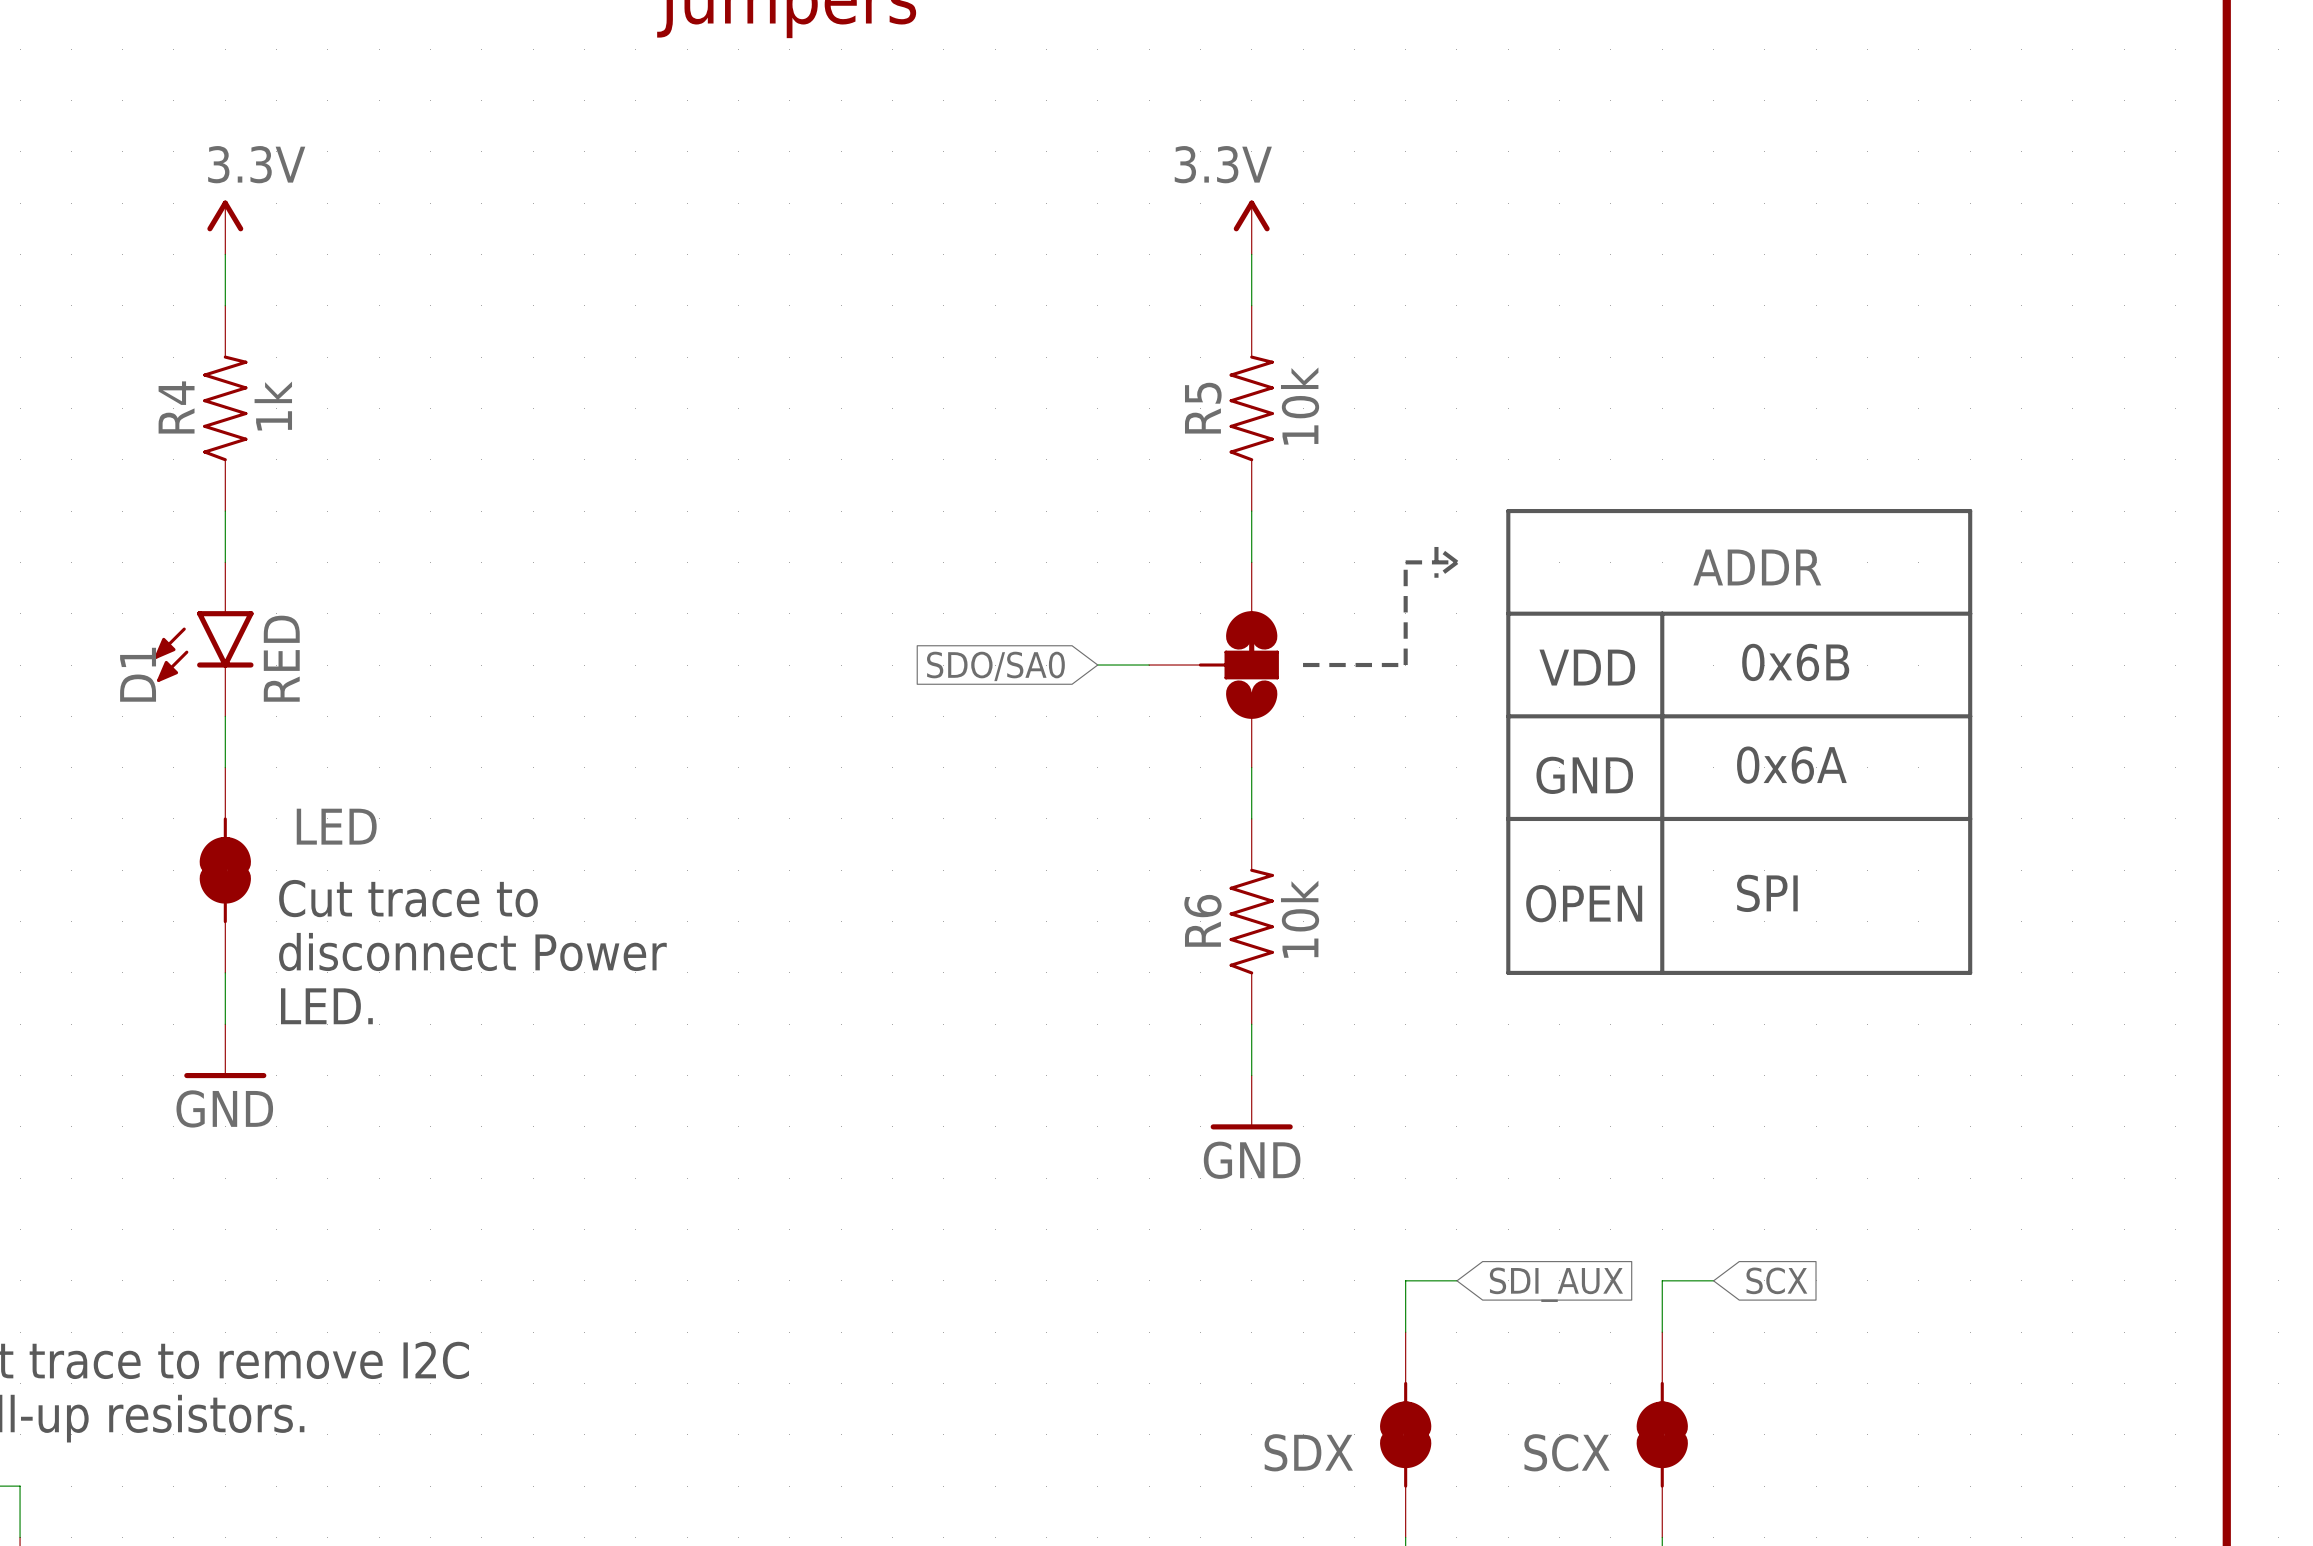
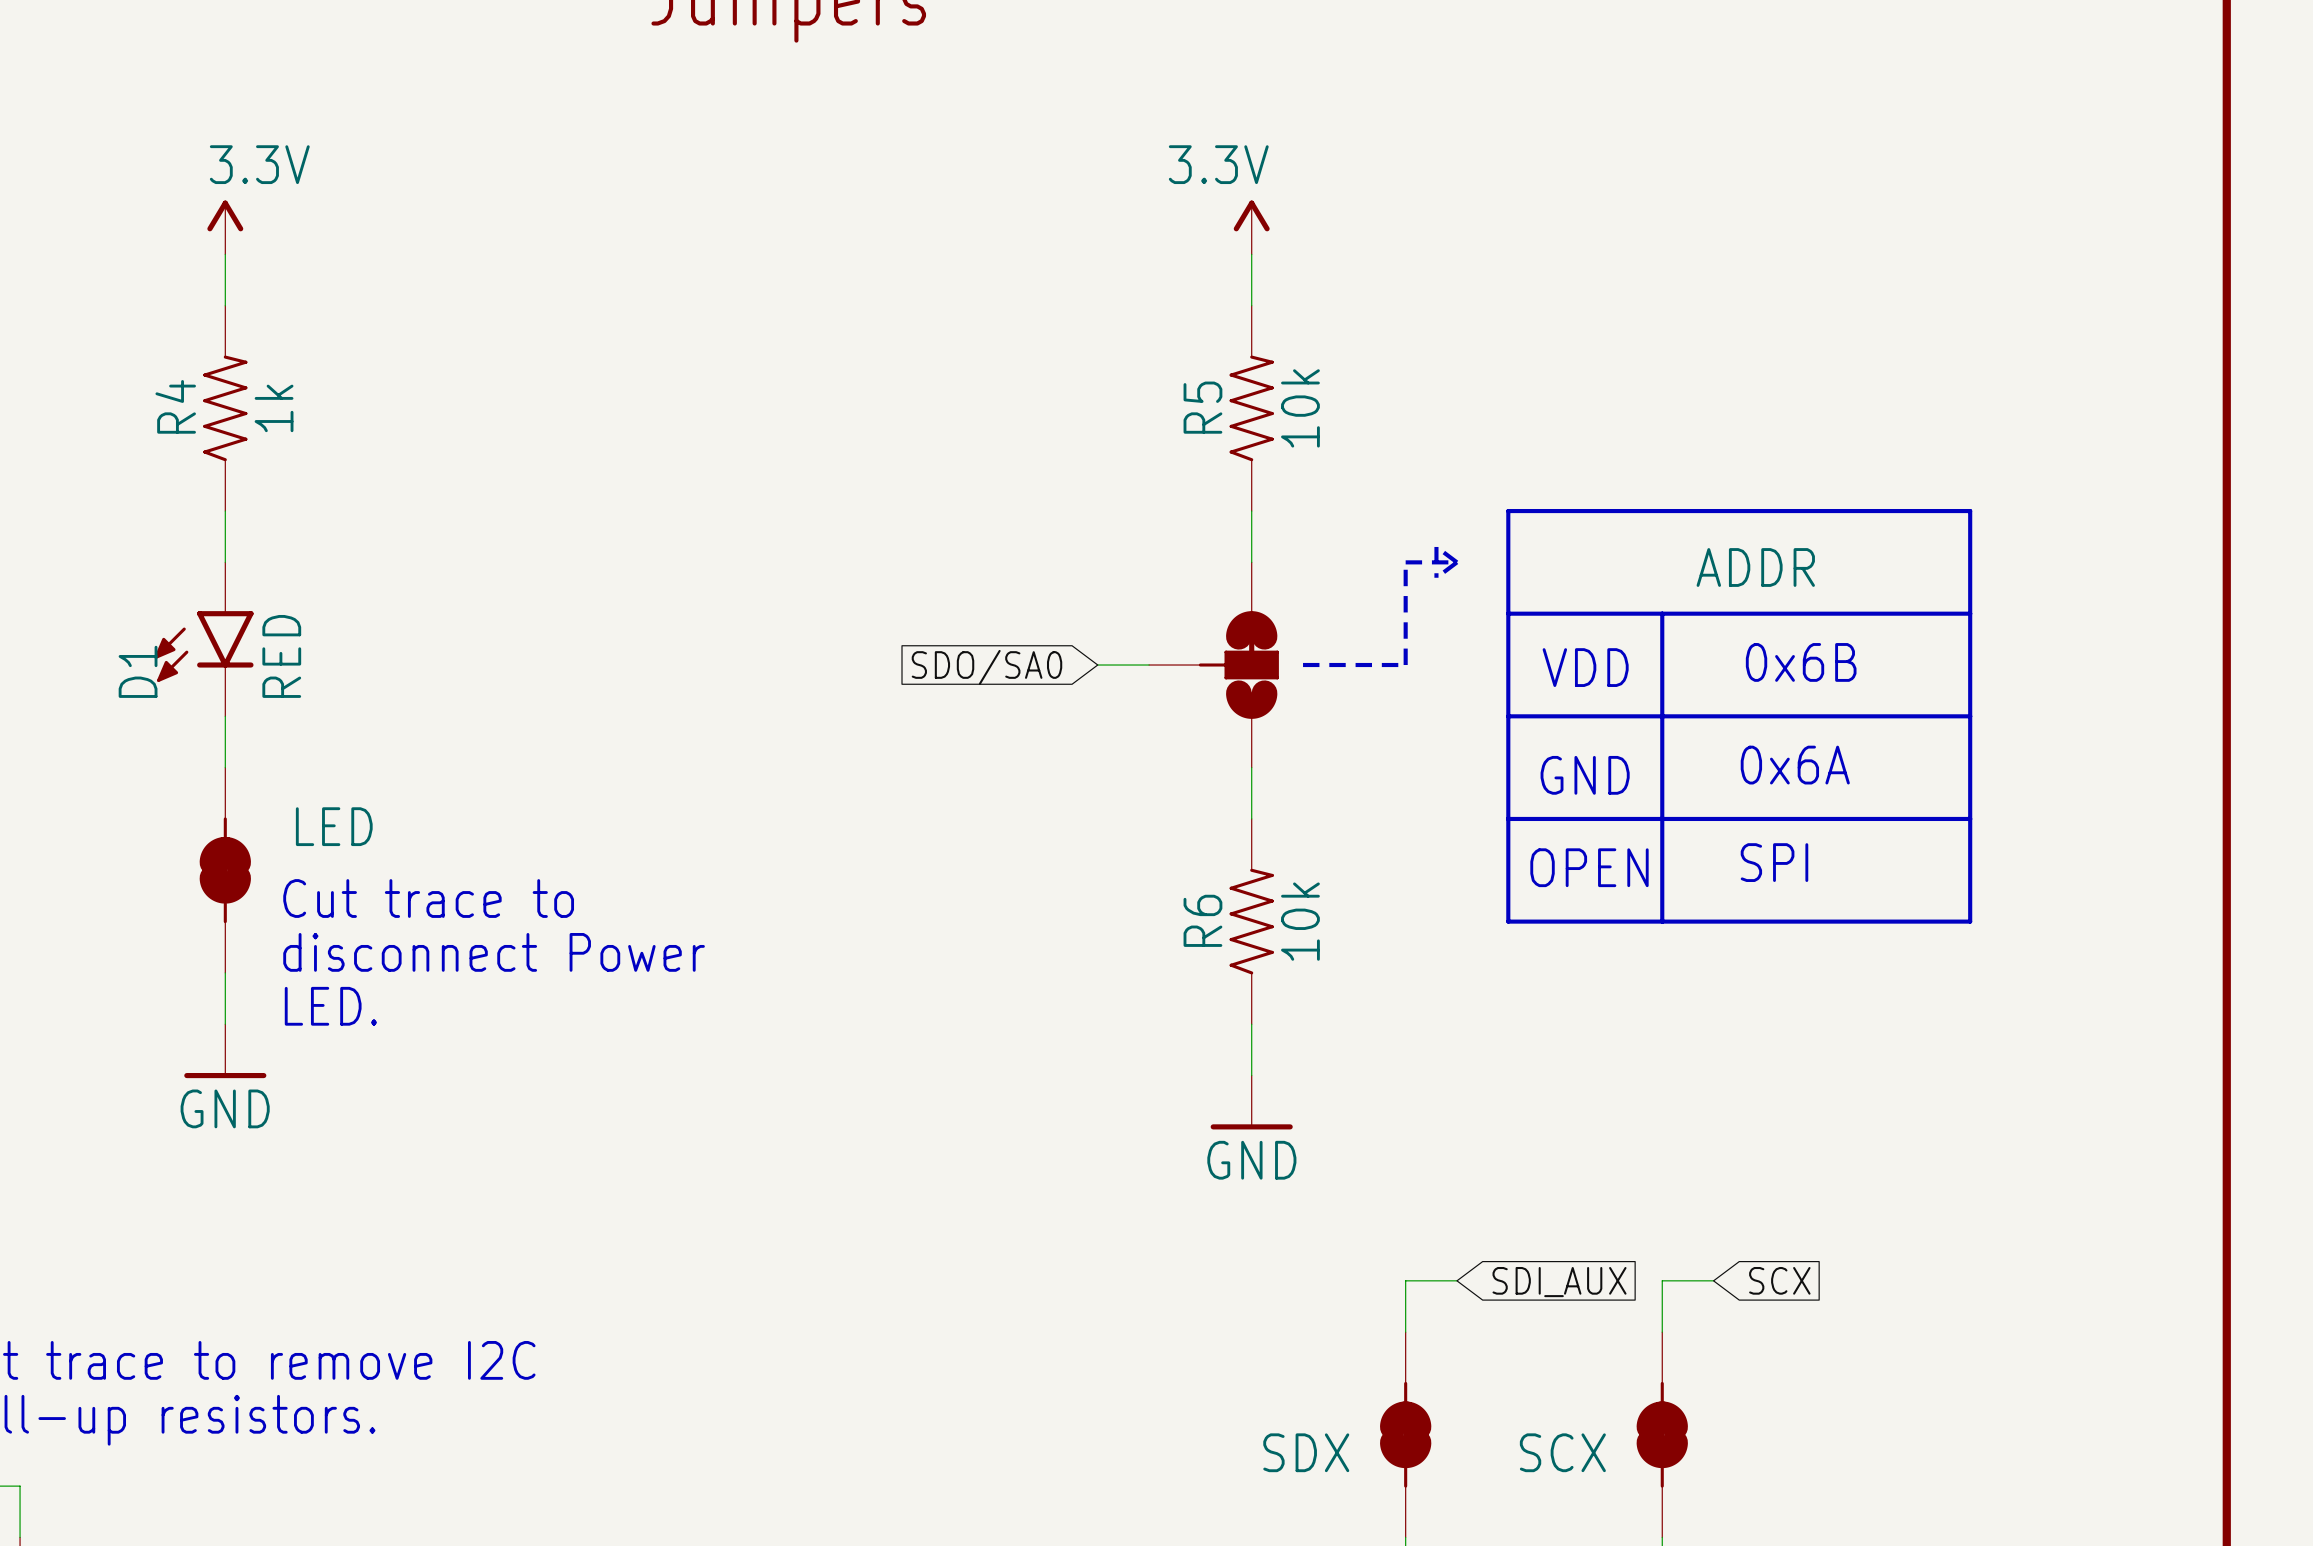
text position: SPI (1767, 893) -> SPI (1774, 862)
text position: OPEN (1584, 903) -> OPEN (1589, 867)
line: (1508, 921) (1508, 972) (1970, 972) (1970, 921) -> (1508, 921) (1970, 921)
line: (1662, 921) (1662, 972) -> none

